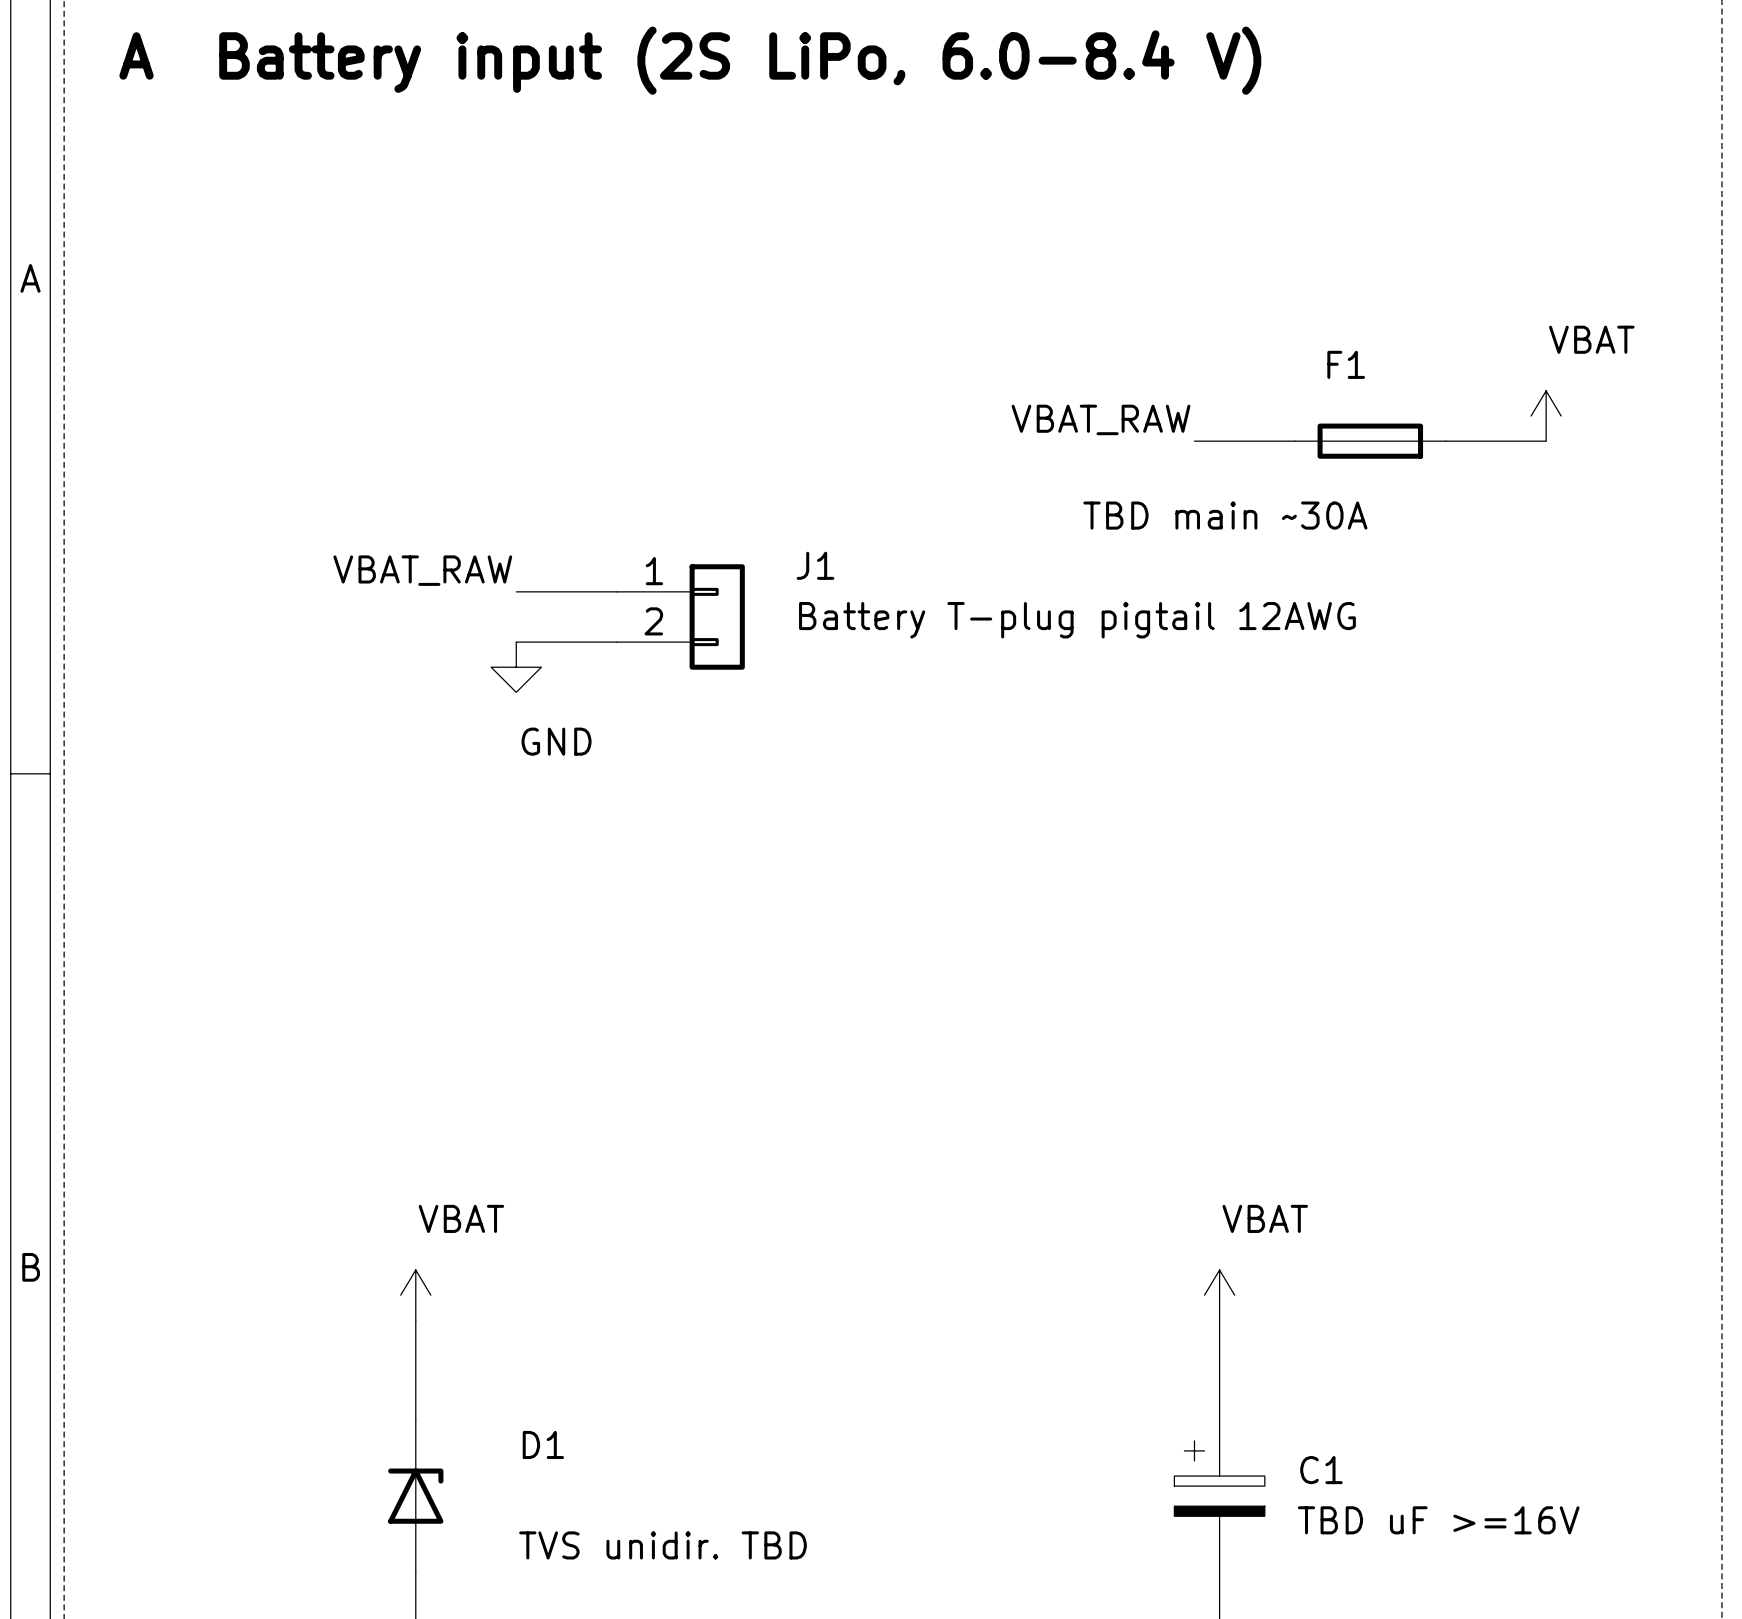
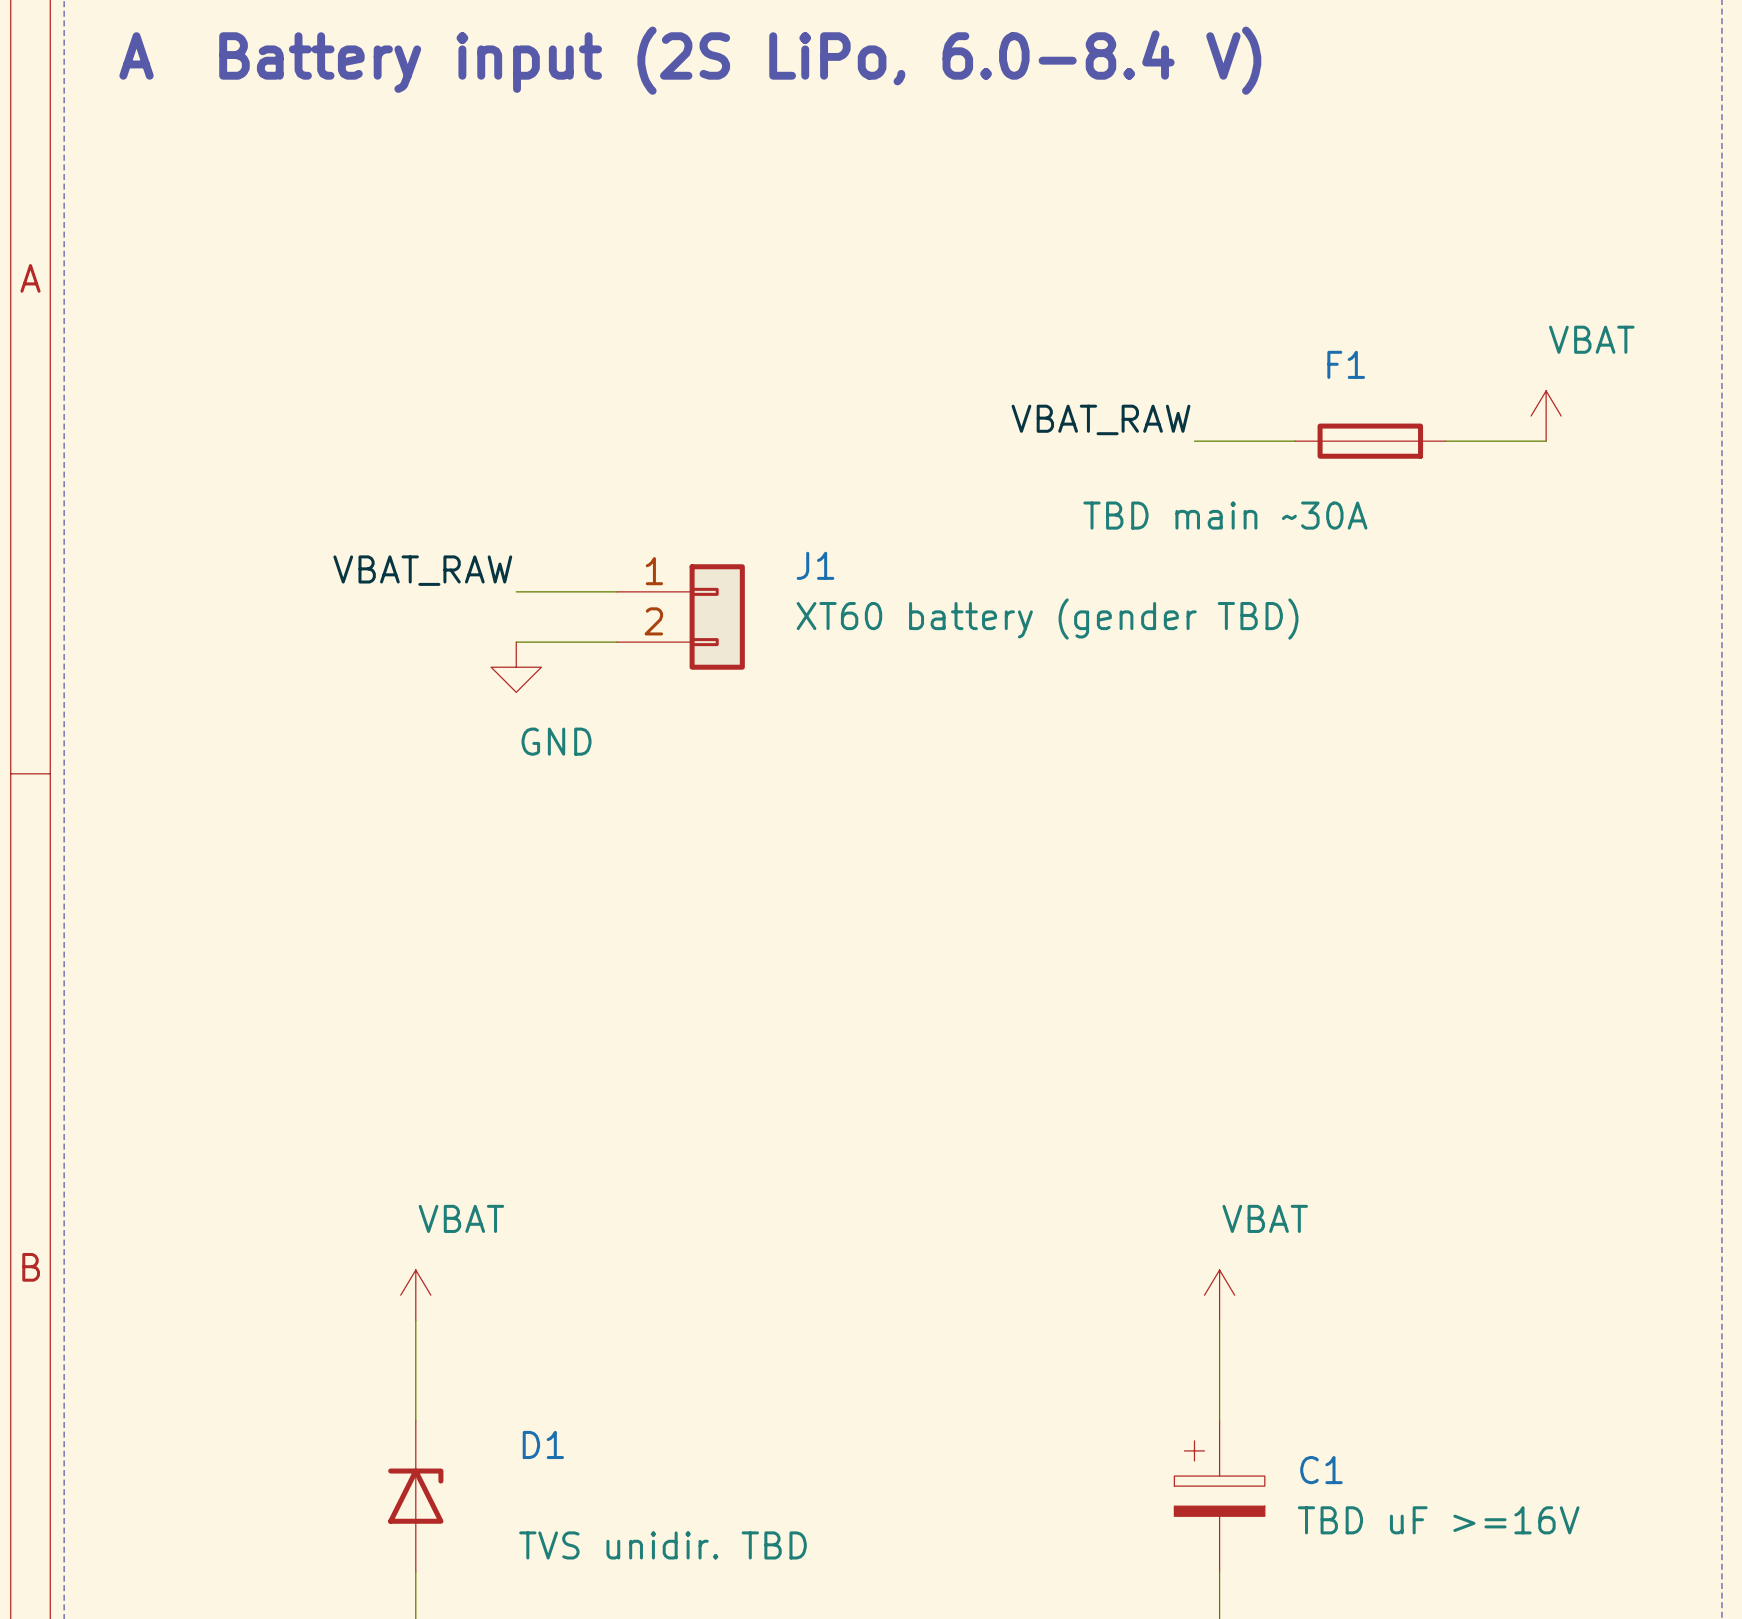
J1 value: Battery T-plug pigtail 12AWG (1077, 620) -> XT60 battery (gender TBD) (1047, 619)

